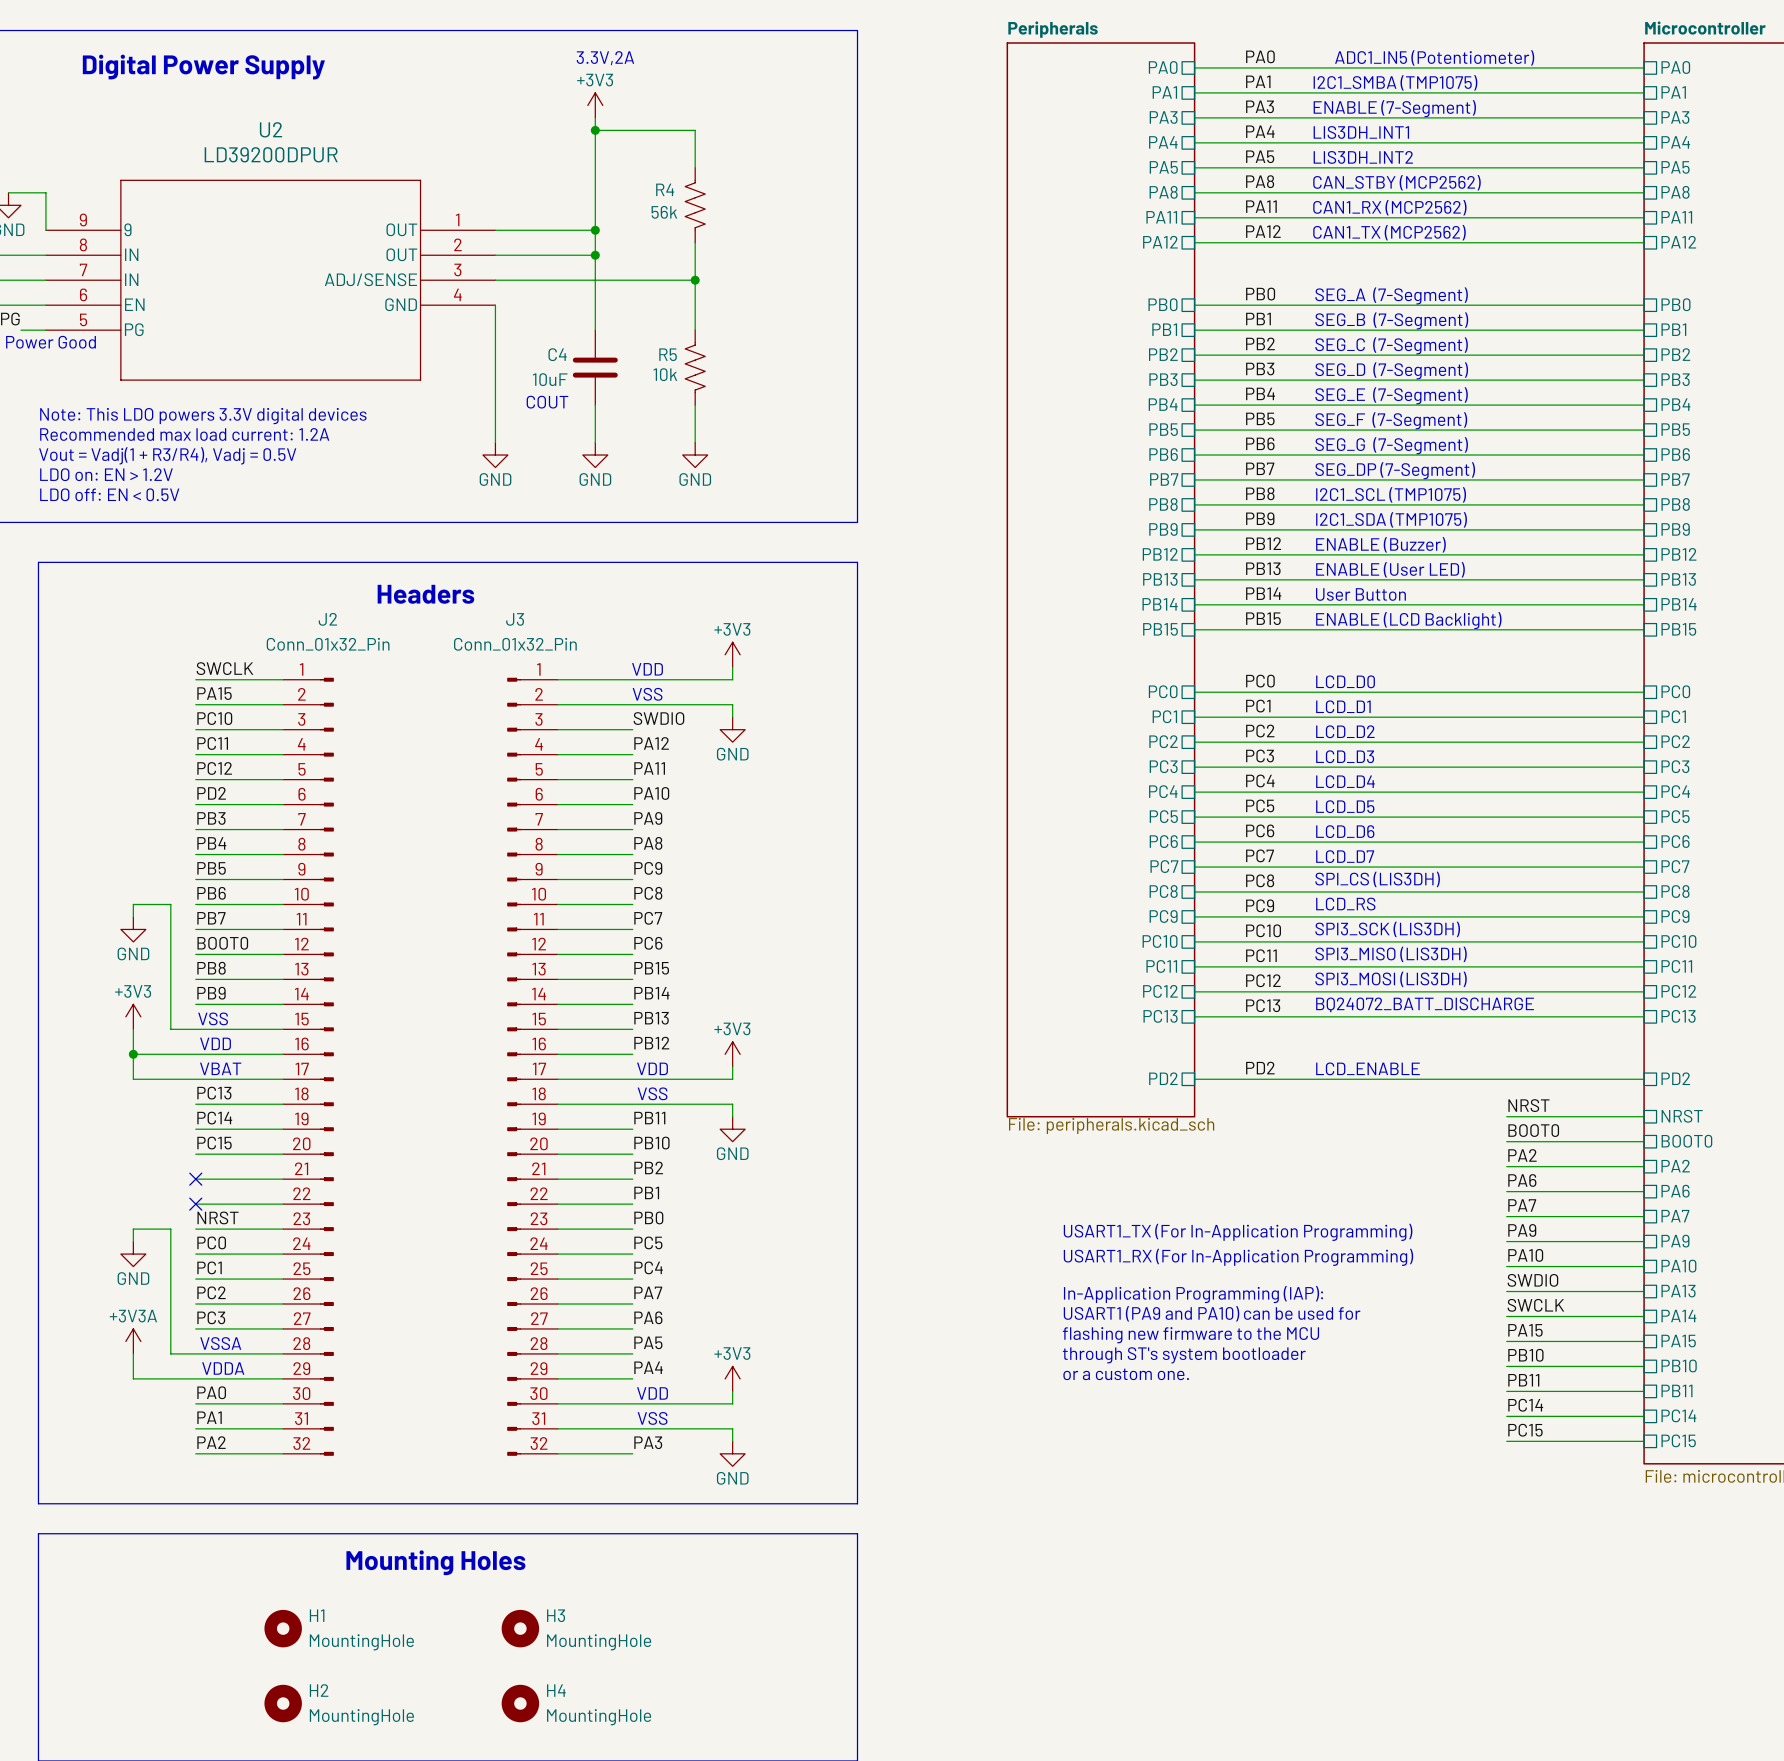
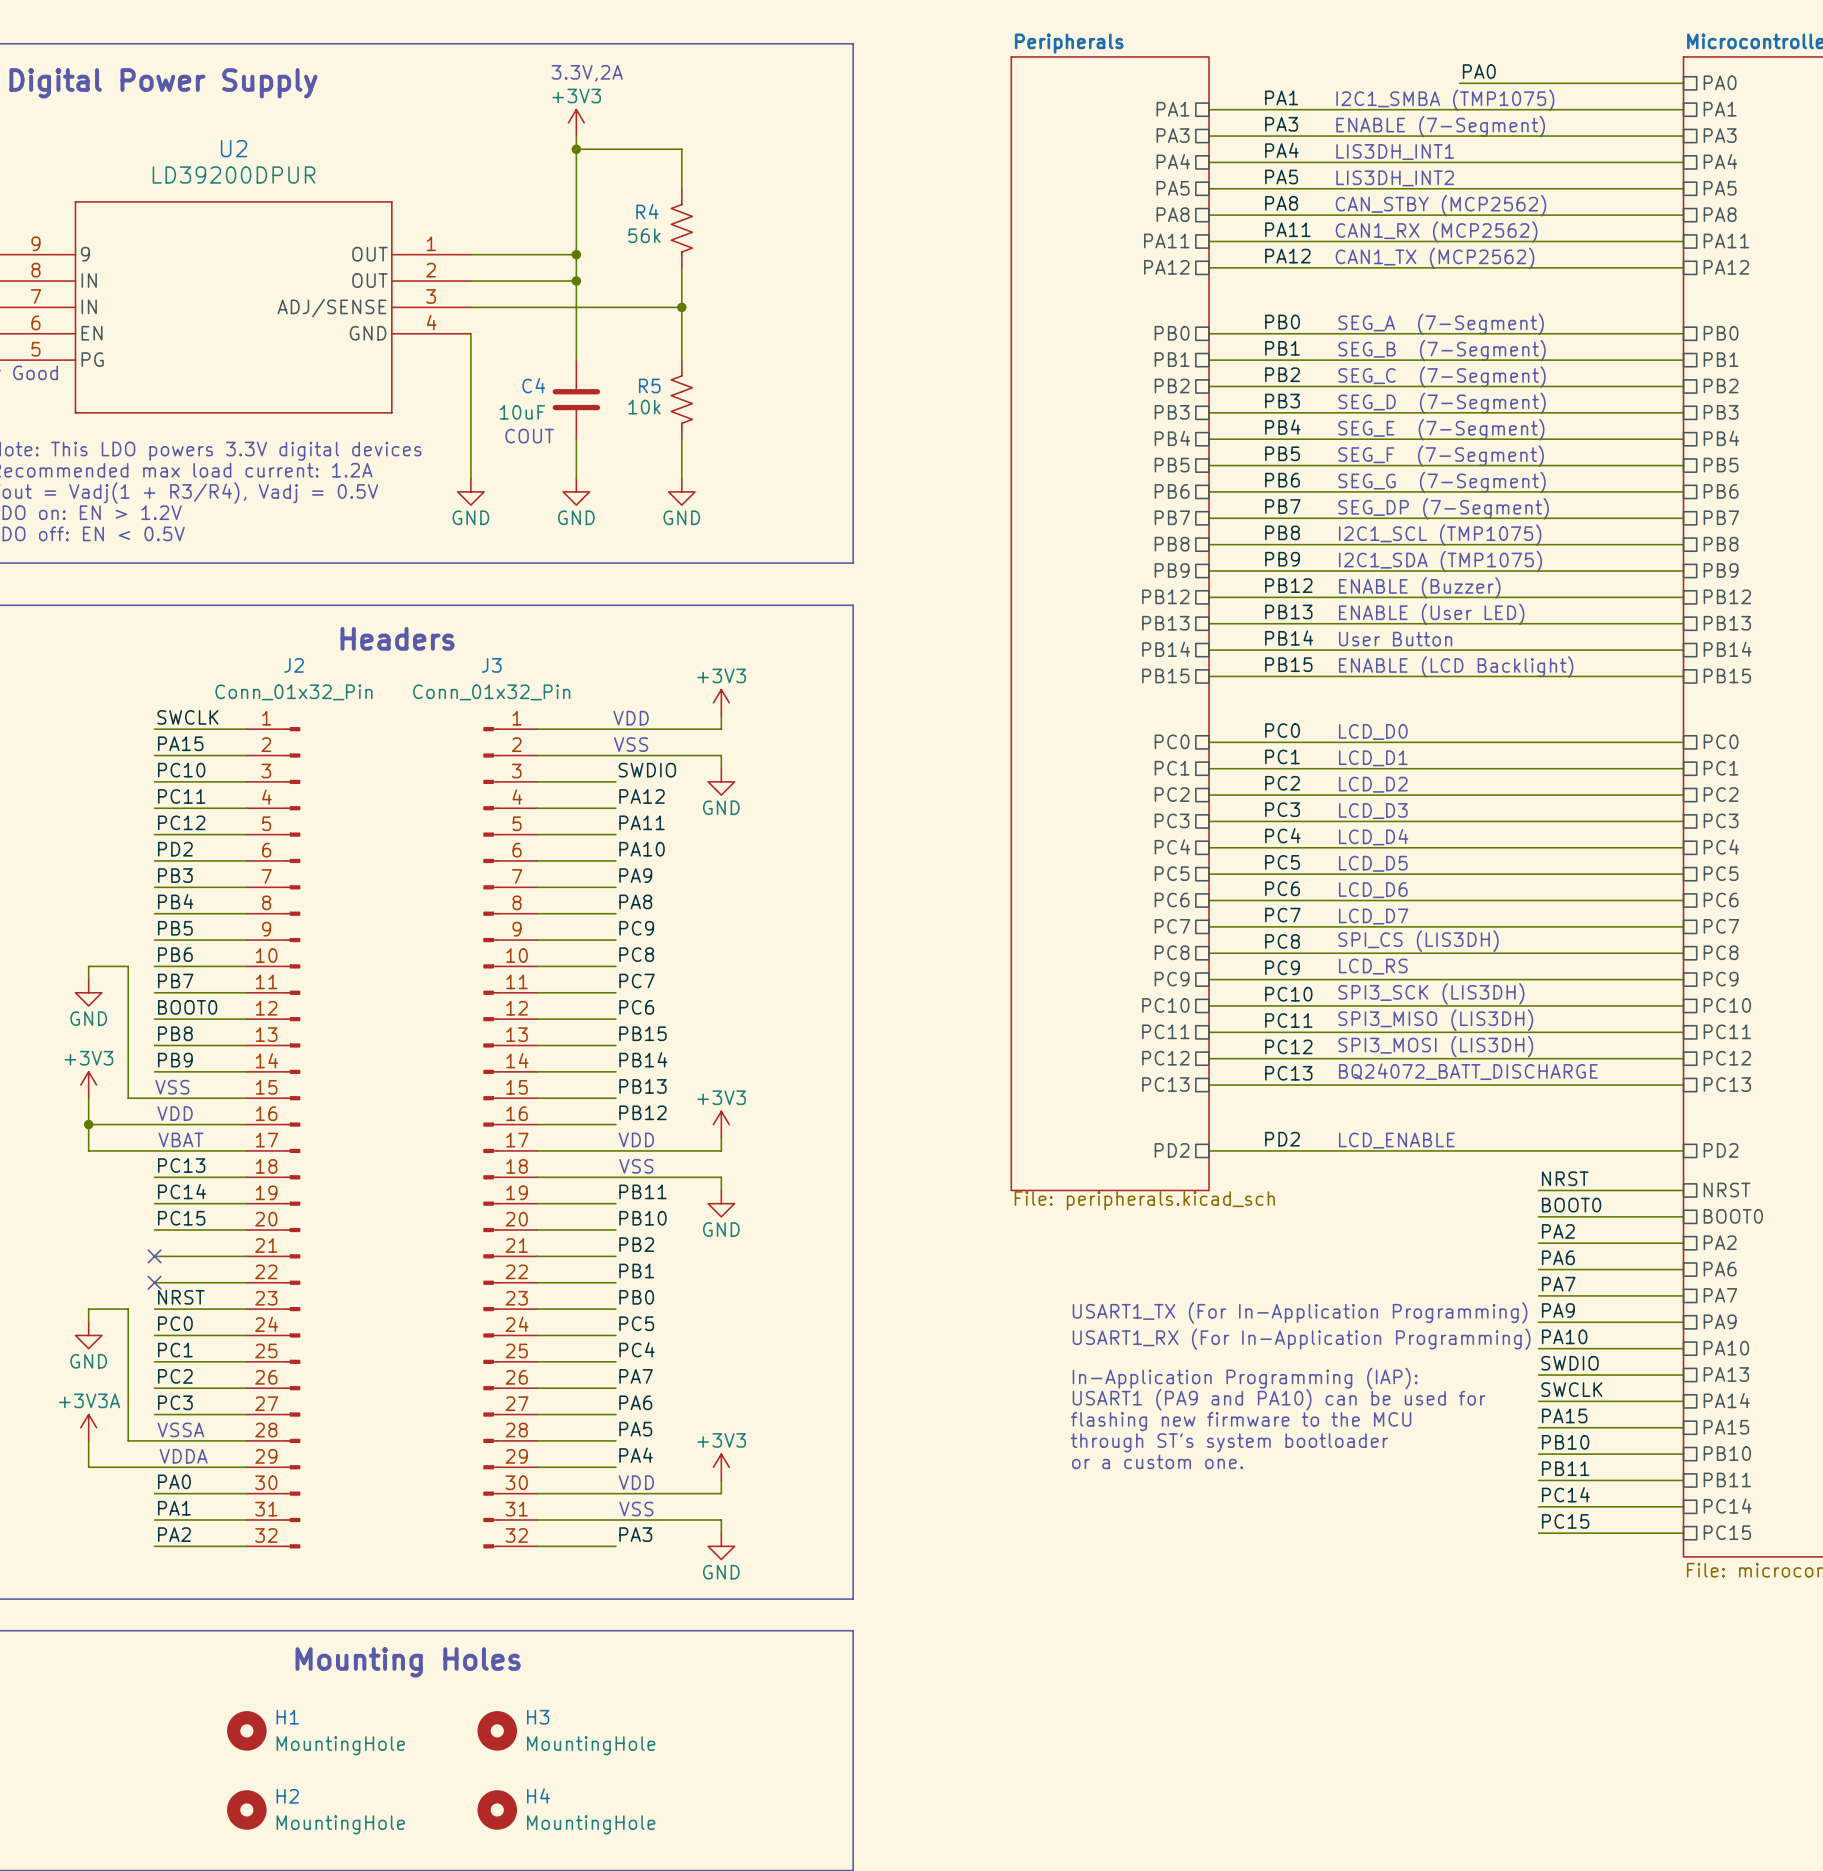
label position: PA0 (1260, 56) -> PA0 (1479, 71)
text: ADC1_IN5 (Potentiometer) (1434, 57) -> none
sheet pin: PA0 (1163, 67) -> none
wire: (1194, 67) (1431, 67) -> none

